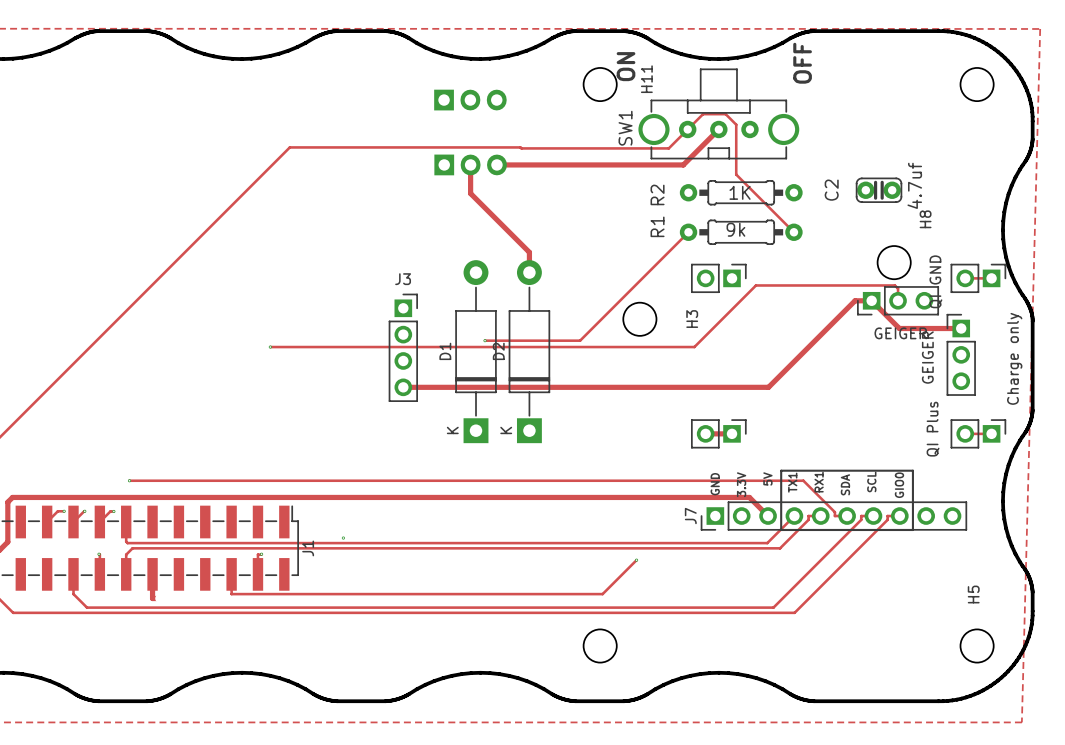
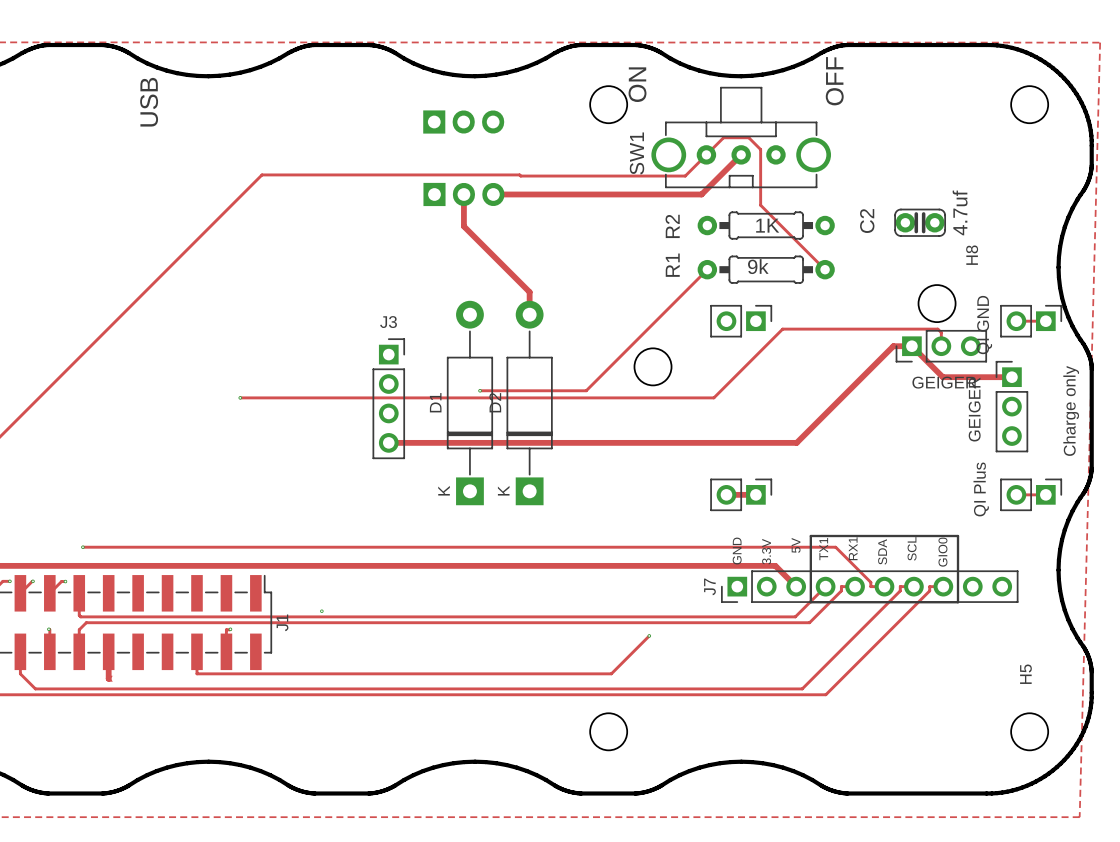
H11 name: H11 (646, 79) -> none
text: none -> USB (149, 102)
H3 name: H3 (692, 319) -> none

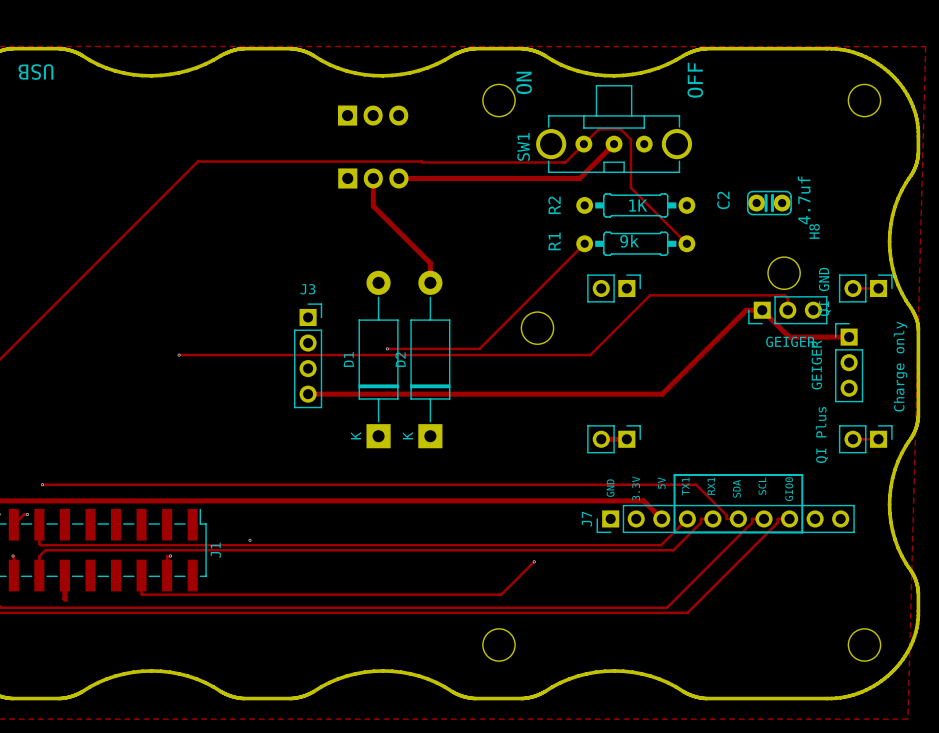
text rotation: 0° (149, 102) -> 90° counterclockwise (35, 72)
text position: USB (149, 102) -> USB (35, 72)
H5 name: H5 (1025, 674) -> none

